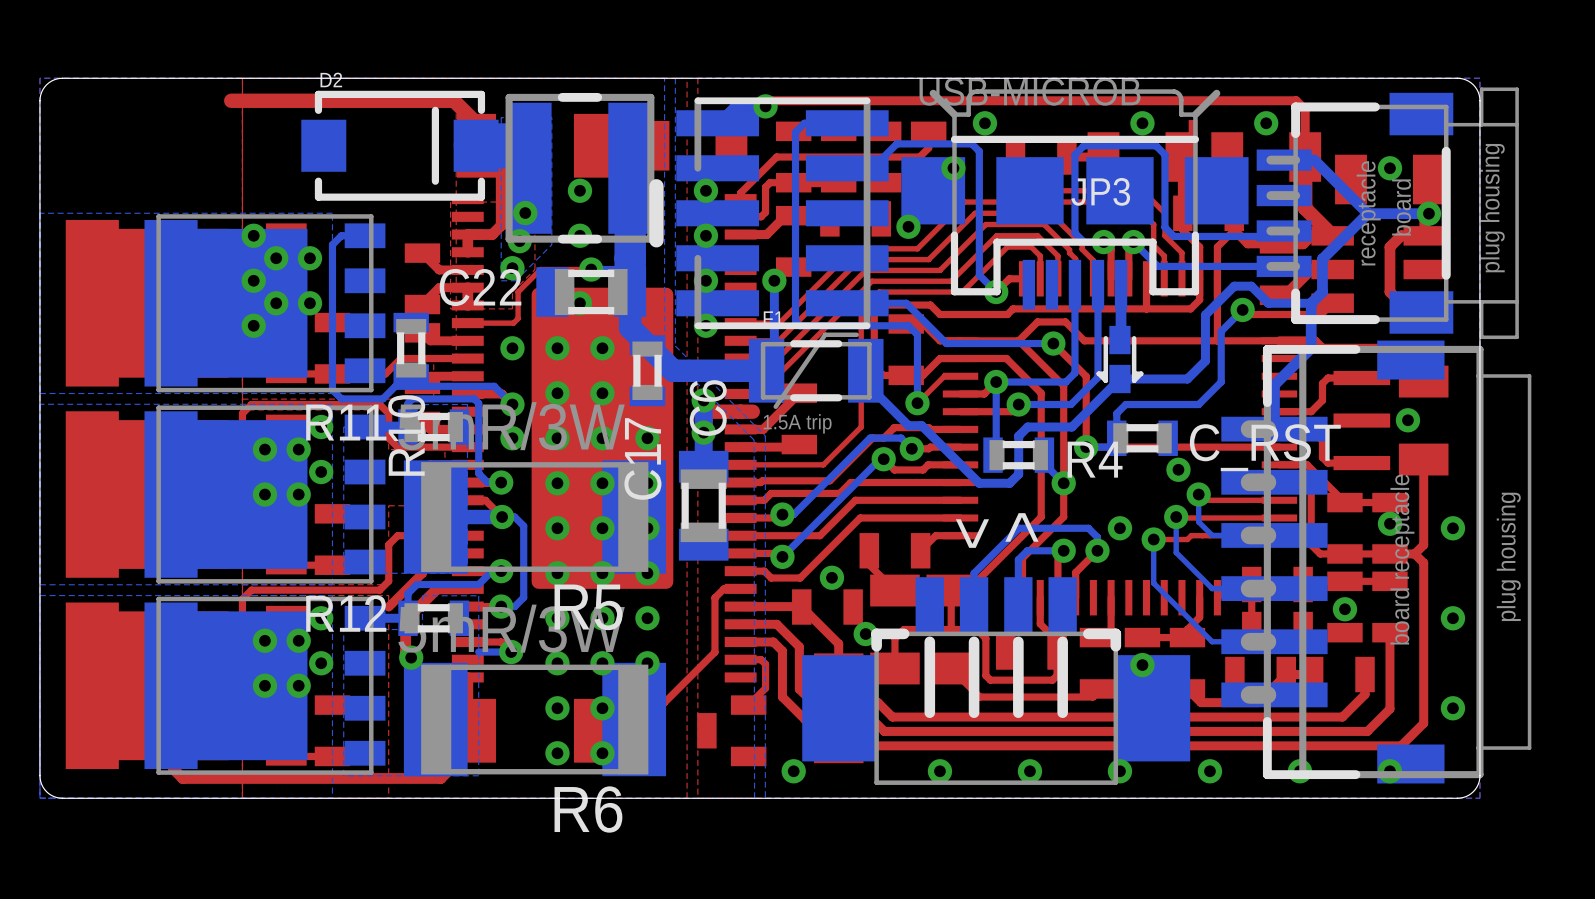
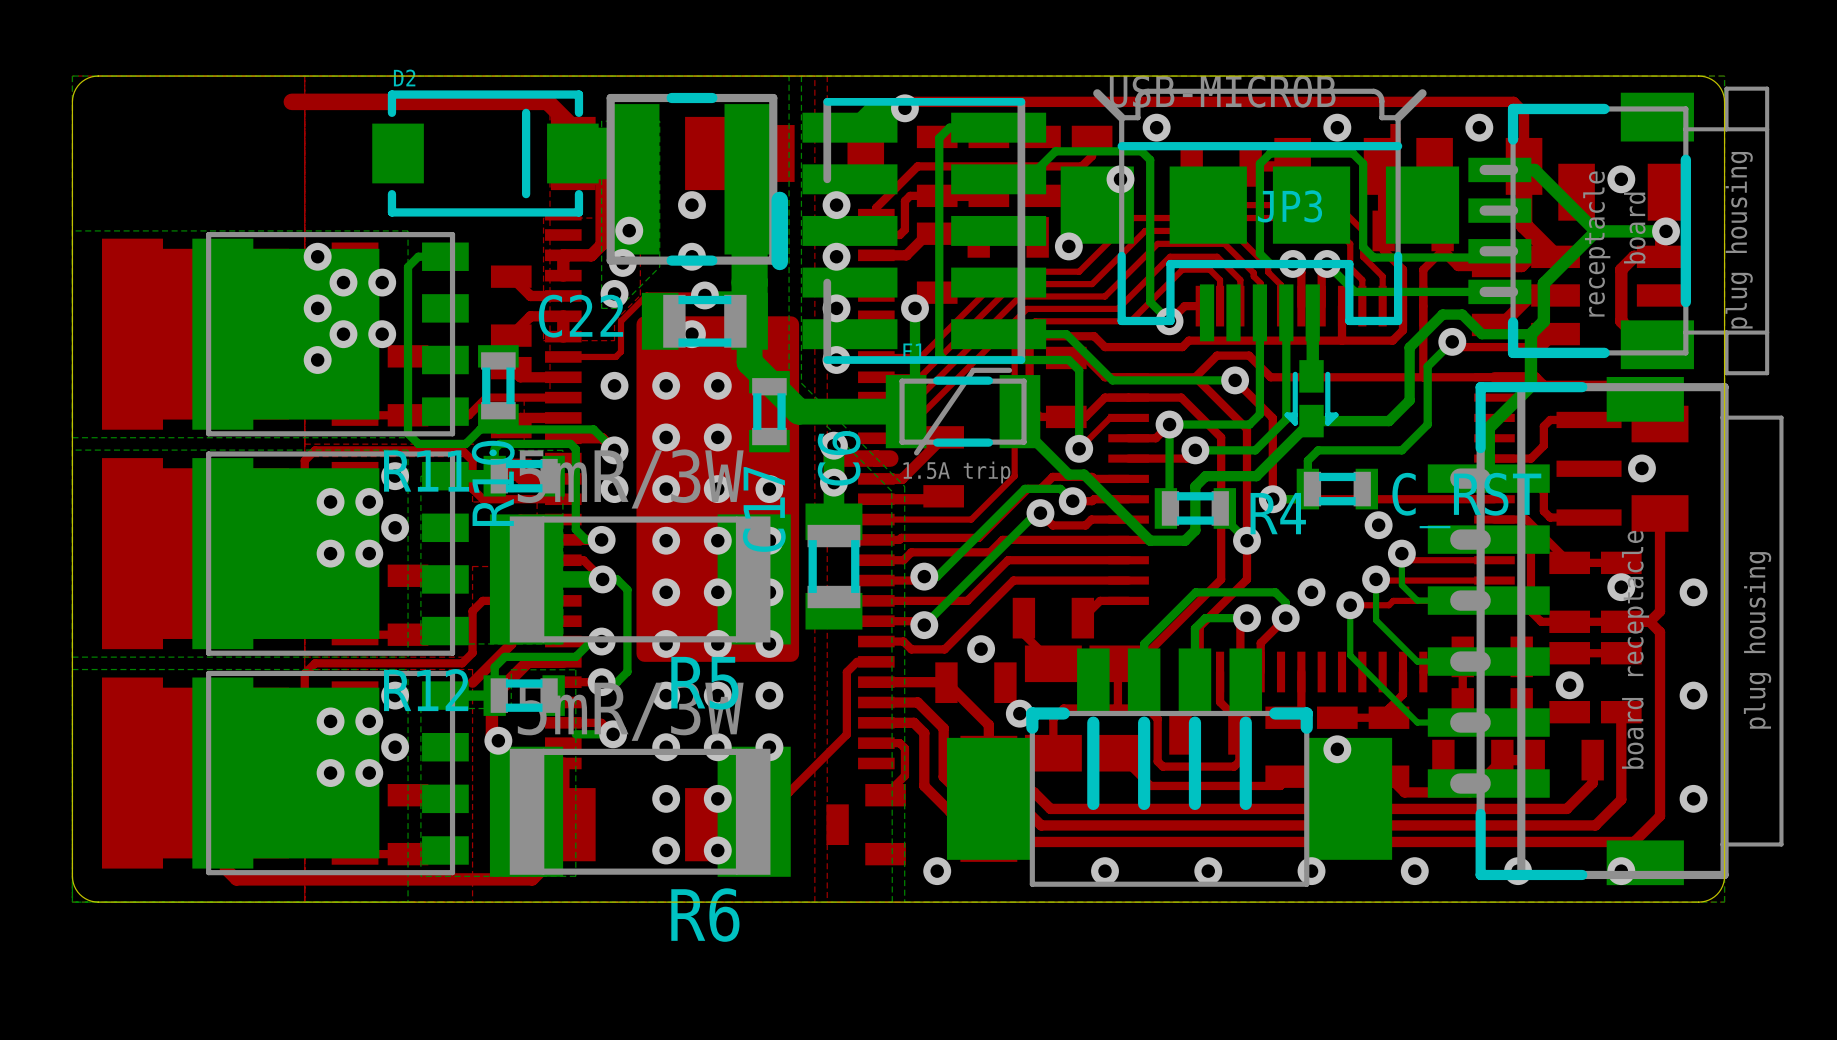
text: > (1021, 527) -> none
text: < (972, 533) -> none

